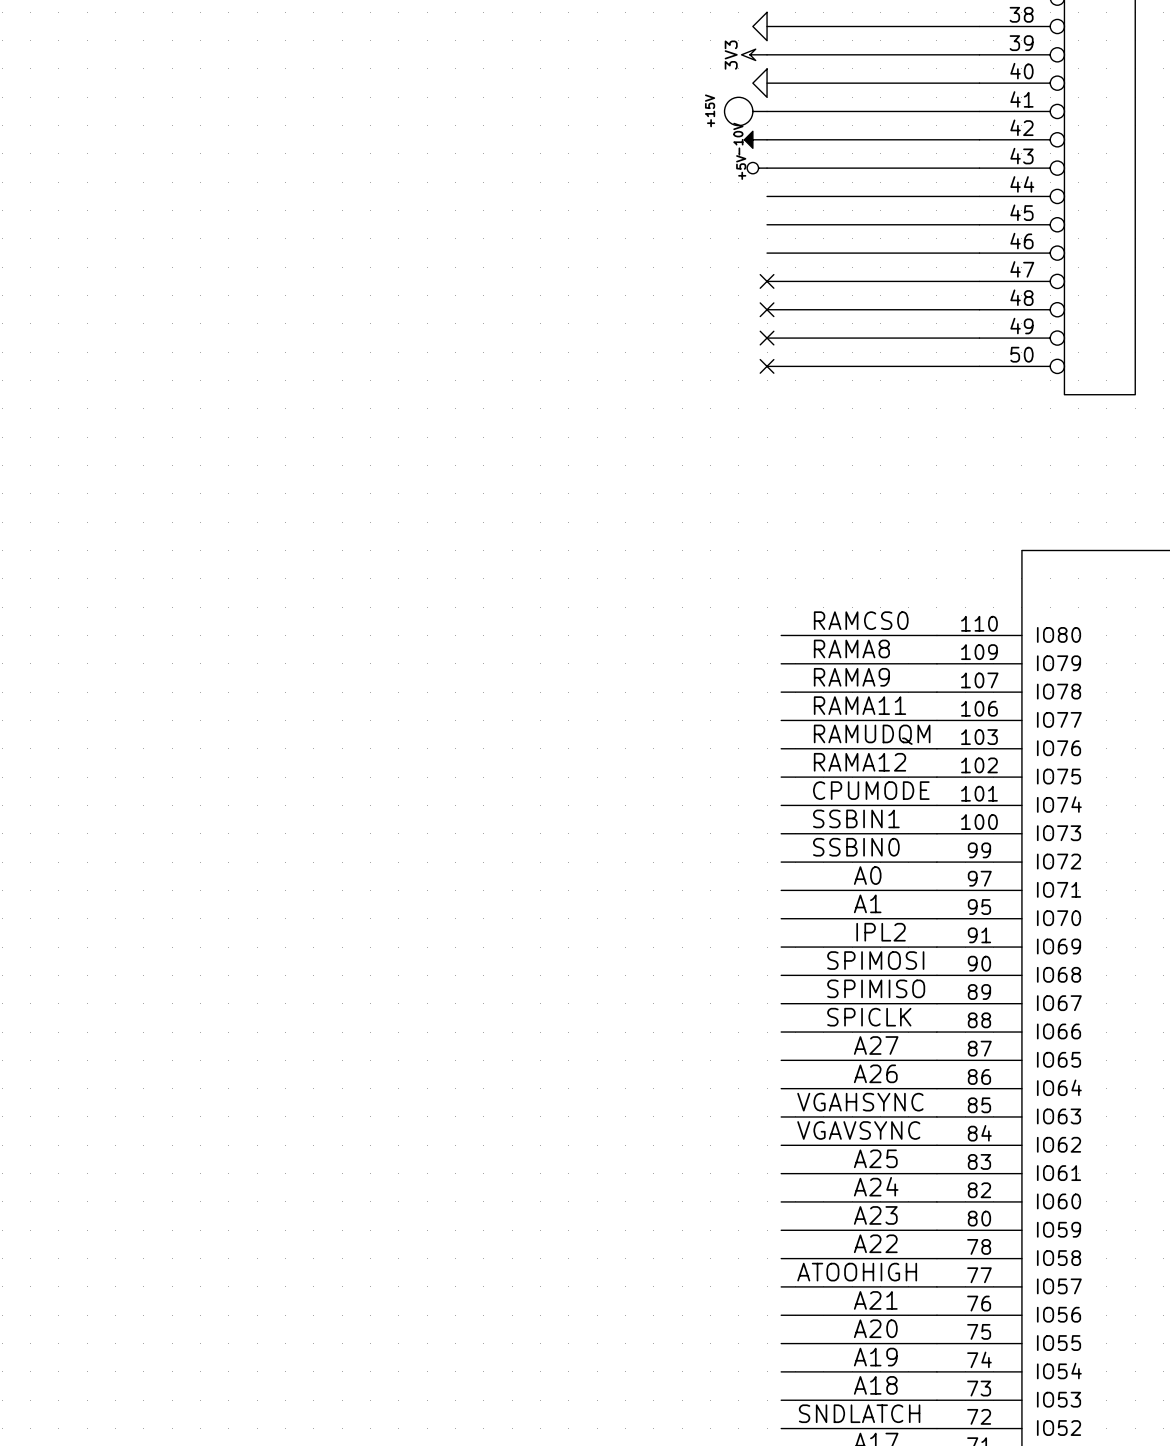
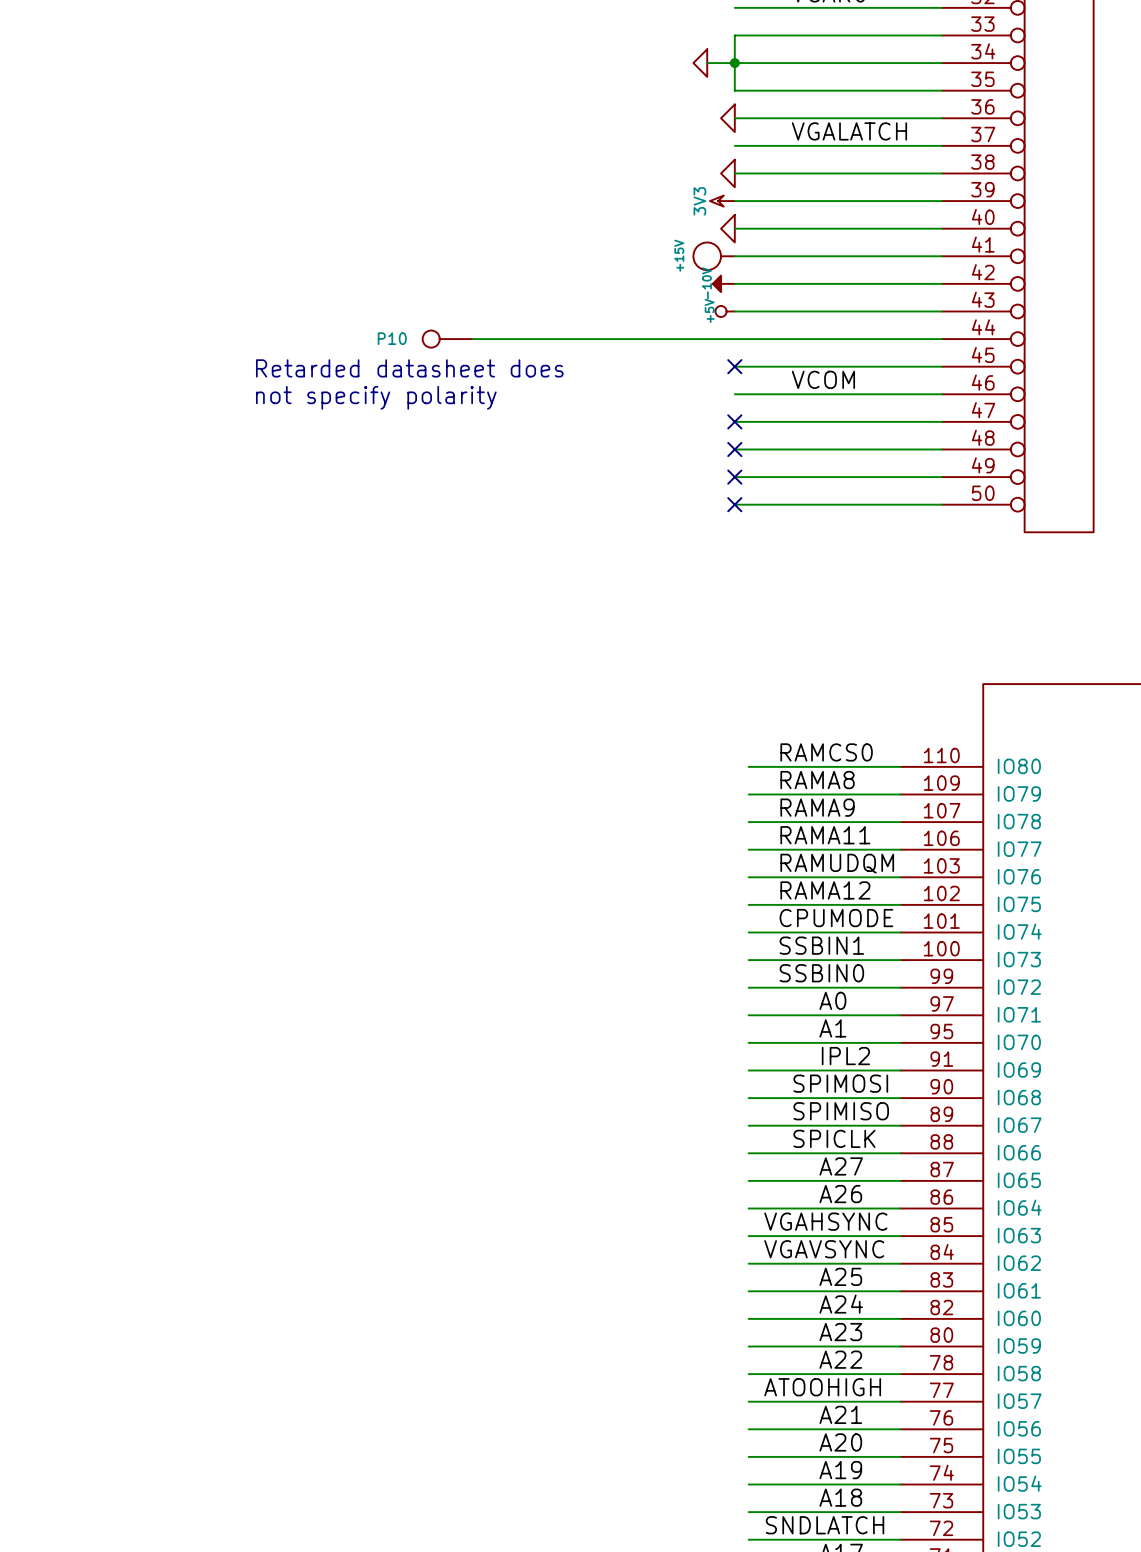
P10: none -> (447, 339)
wire: none -> (472, 339) (734, 339)
no-connect mark: none -> (734, 366)
text: none -> Retarded datasheet does (409, 368)
label: none -> VCOM (823, 379)
text: none -> not specify polarity (376, 397)

